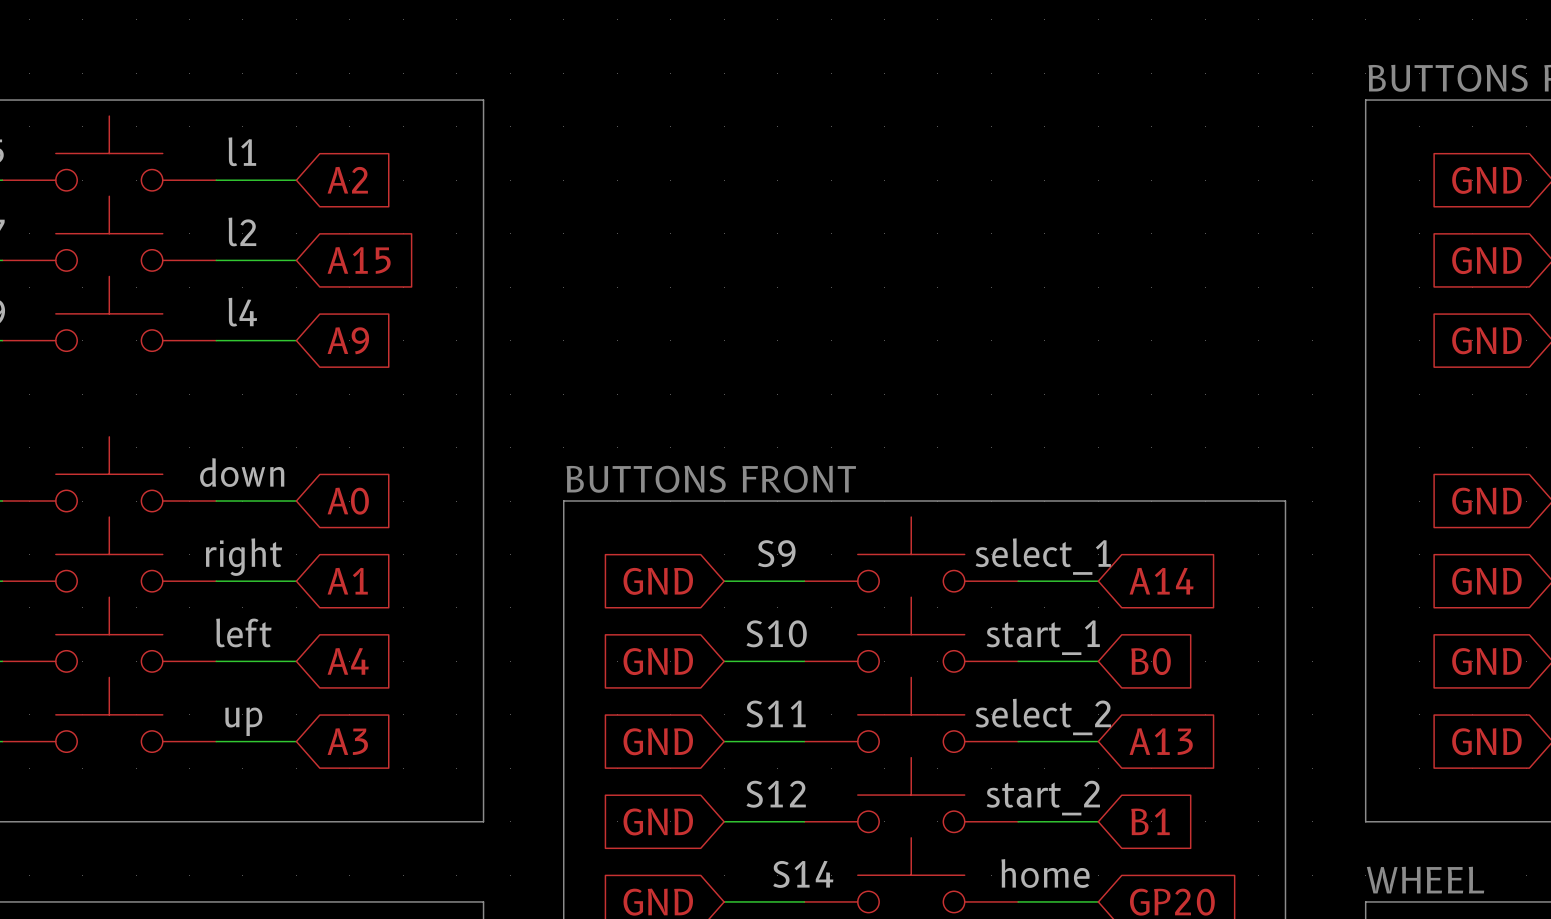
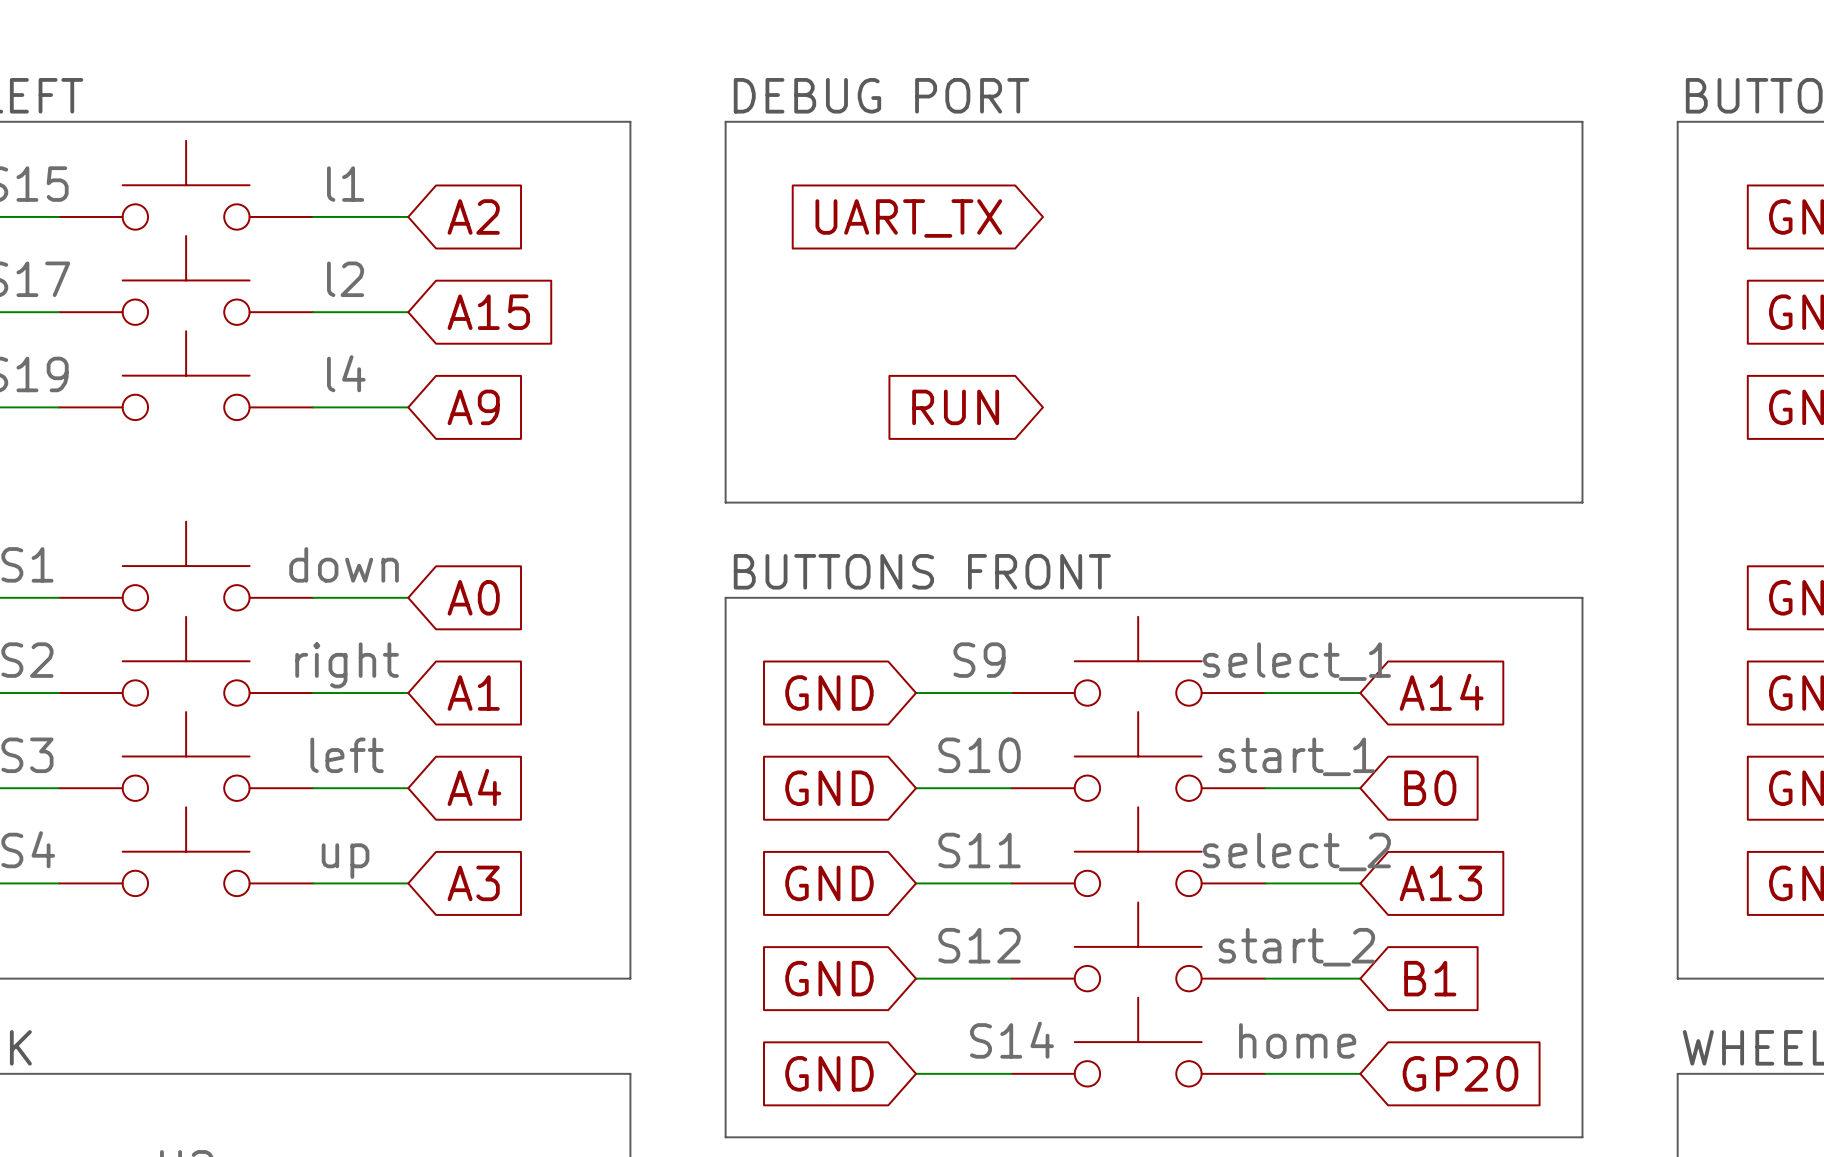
text: none -> DEBUG PORT (881, 95)
line: none -> (725, 121) (725, 502) (1582, 502) (1582, 121) (725, 121)
global label: none -> UART_TX (908, 218)
global label: none -> RUN (955, 407)

